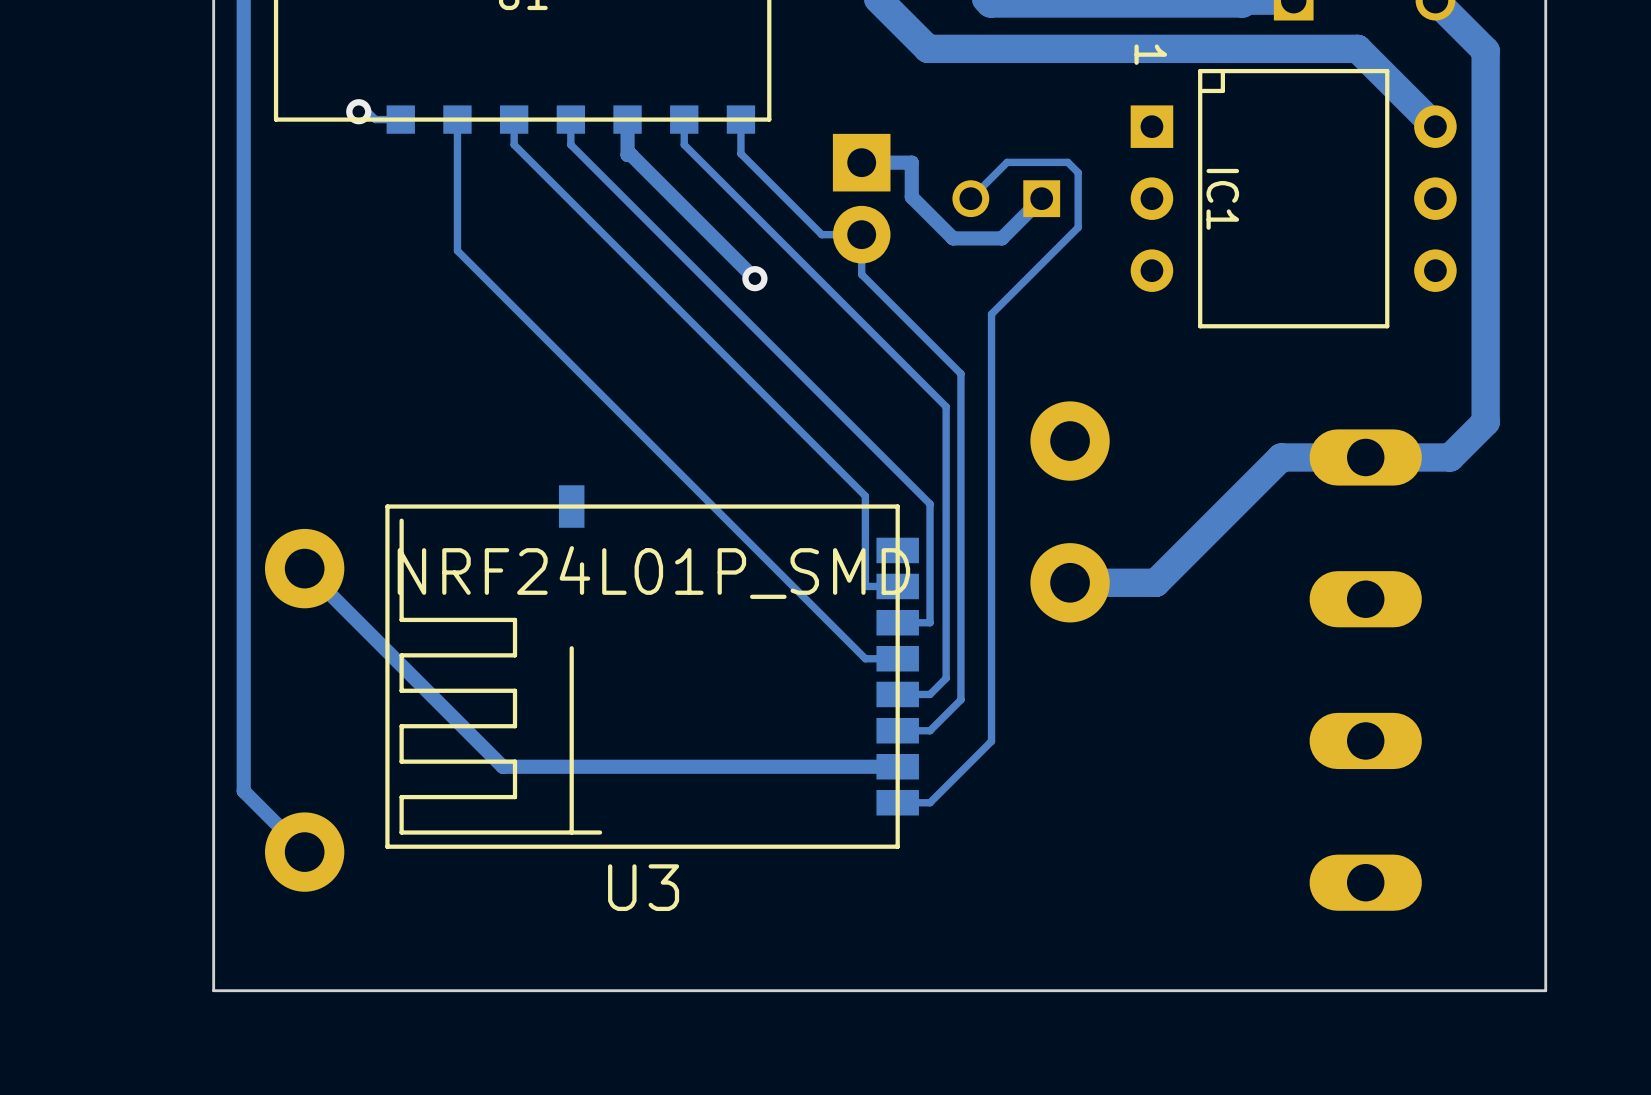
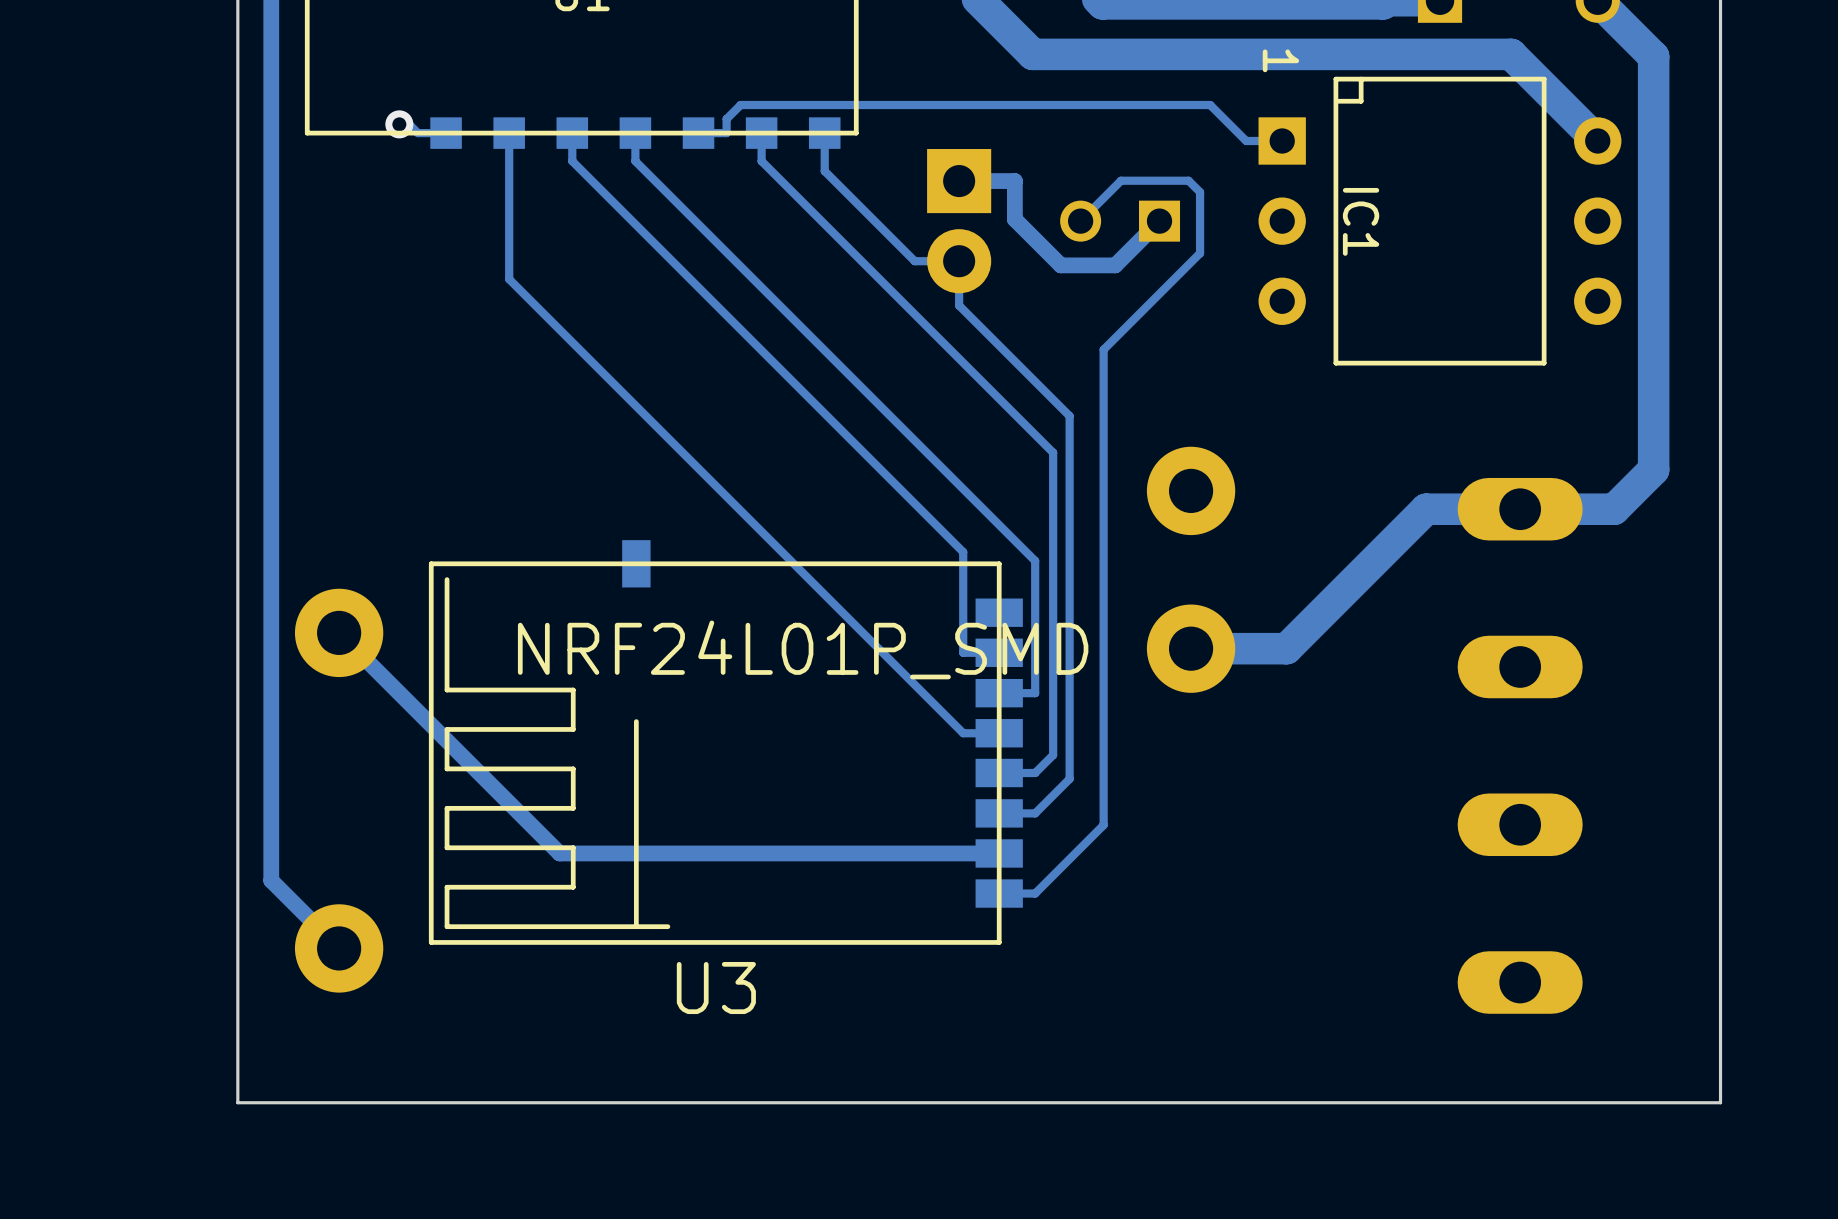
track: (627, 119) (627, 155) (631, 155) (754, 278) -> (698, 133) (726, 133) (726, 119) (740, 105) (1210, 105) (1246, 140) (1282, 140)
via: (754, 278) -> none
U3 value position: NRF24L01P_SMD (653, 572) -> NRF24L01P_SMD (803, 649)

